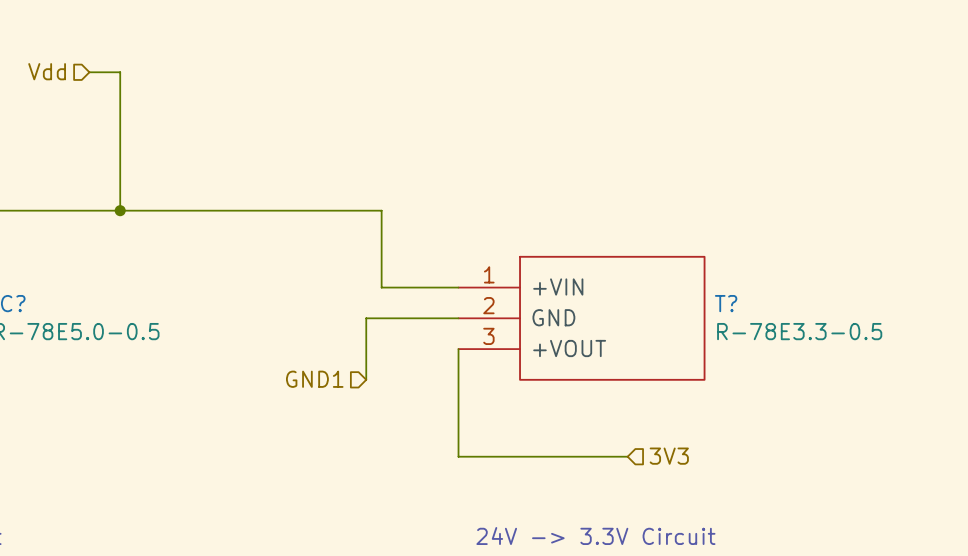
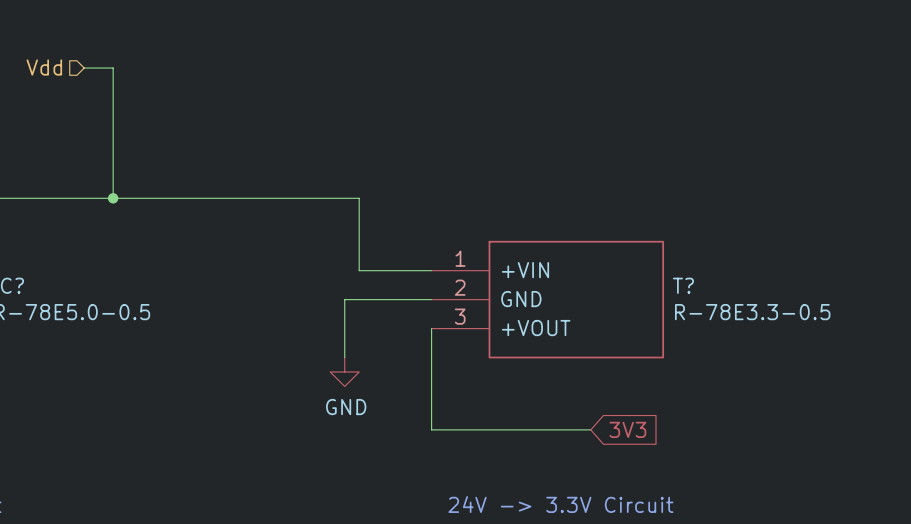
hierarchical label: GND1 (314, 379) -> none
power symbol: none -> GND (344, 371)
global label: none -> 3V3 (627, 429)
hierarchical label: 3V3 (669, 456) -> none

